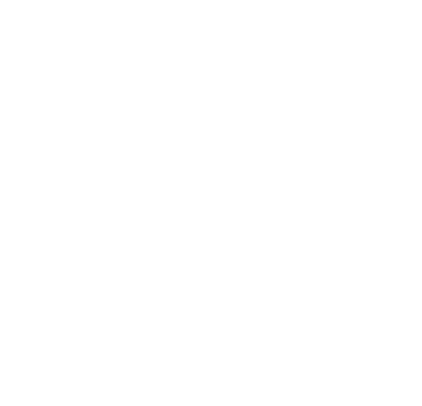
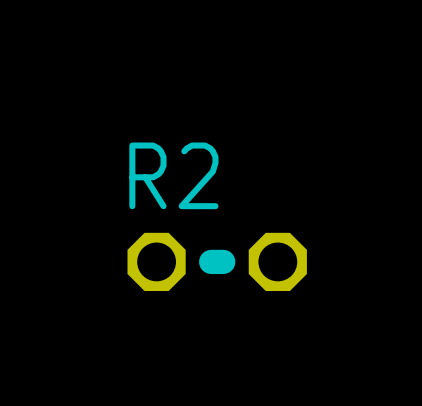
R2: none -> (217, 261)

